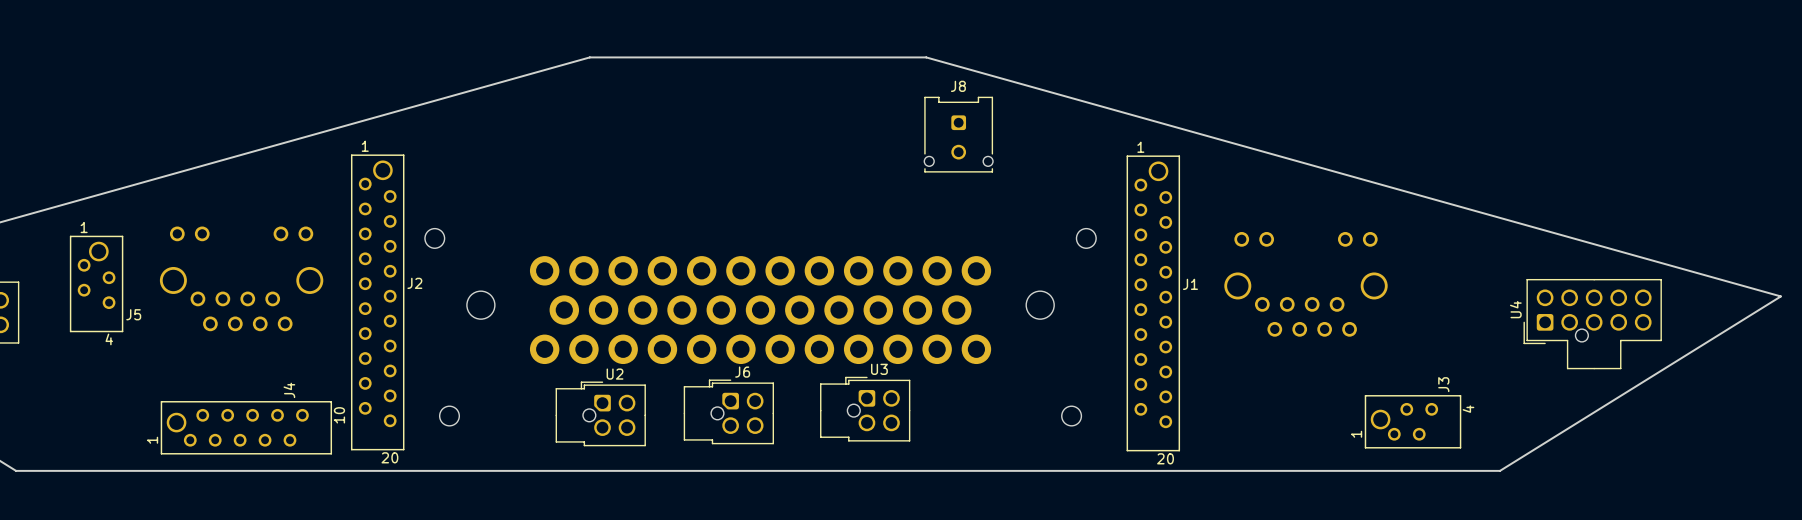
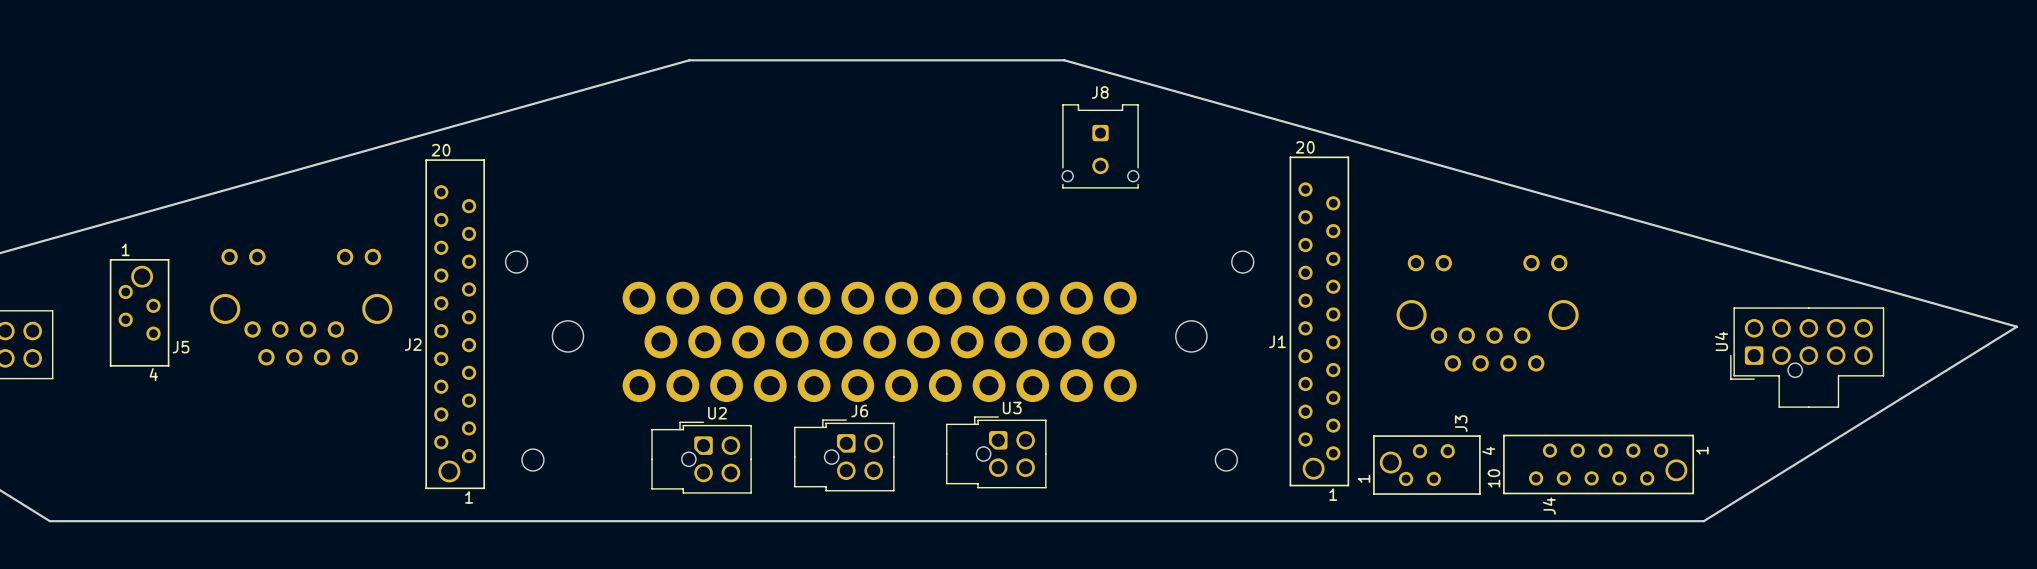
J2 rotation: 0° (377, 302) -> 180° (455, 324)
J1 rotation: 0° (1153, 303) -> 180° (1319, 321)
J3 position: (1413, 421) -> (1426, 465)
J4 rotation: 0° (246, 427) -> 180° (1598, 464)
J4 position: (246, 427) -> (1598, 464)

